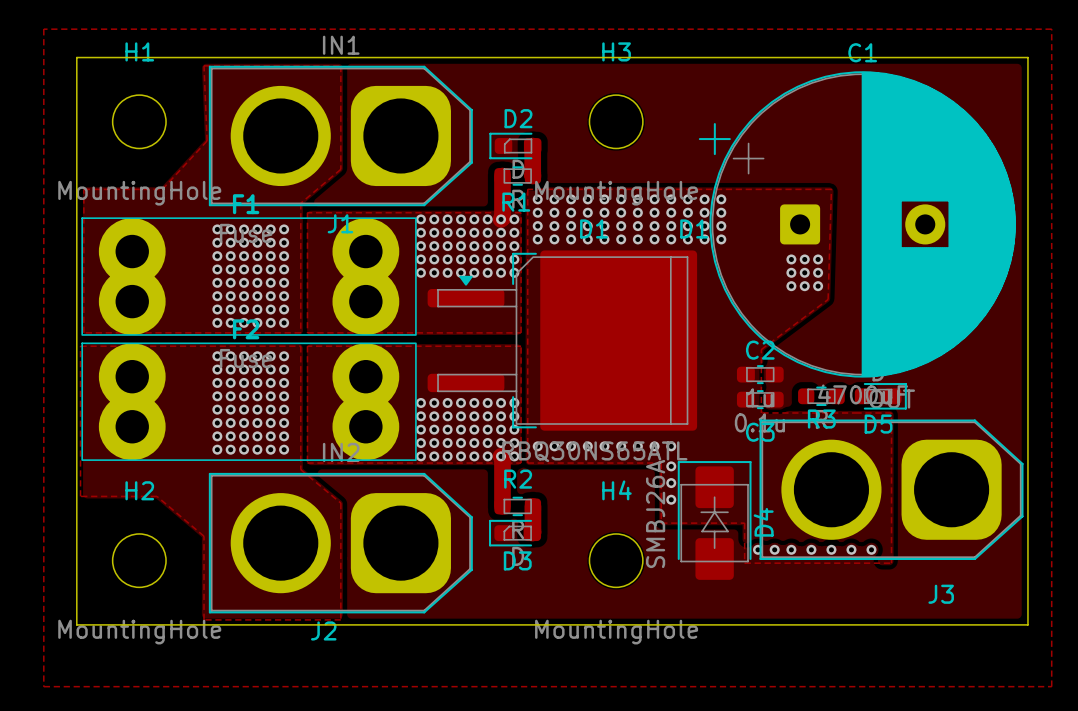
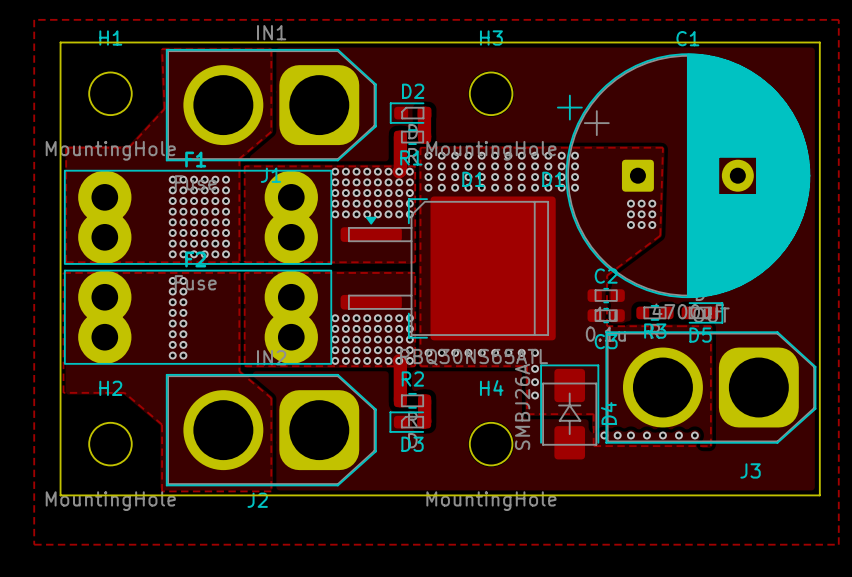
via: (244, 356) -> none
via: (257, 356) -> none
via: (270, 356) -> none
via: (284, 356) -> none
via: (244, 369) -> none
via: (257, 369) -> none
via: (270, 369) -> none
via: (284, 369) -> none
via: (244, 382) -> none
via: (257, 382) -> none
via: (270, 382) -> none
via: (284, 382) -> none
via: (244, 396) -> none
via: (257, 396) -> none
via: (270, 396) -> none
via: (284, 396) -> none
via: (244, 409) -> none
via: (257, 409) -> none
via: (270, 409) -> none
via: (284, 409) -> none
via: (244, 422) -> none
via: (257, 422) -> none
via: (270, 422) -> none
via: (284, 422) -> none
via: (244, 436) -> none
via: (257, 436) -> none
via: (270, 436) -> none
via: (284, 436) -> none
via: (244, 449) -> none
via: (257, 449) -> none
via: (270, 449) -> none
via: (284, 449) -> none

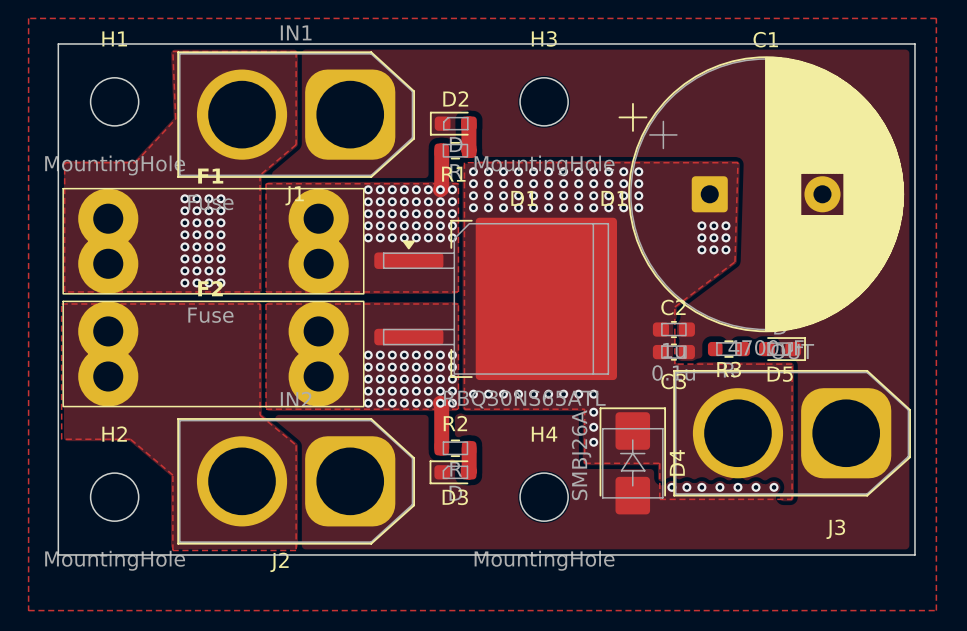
via: (215, 179) -> none
via: (226, 179) -> none
via: (215, 190) -> none
via: (226, 190) -> none
via: (215, 201) -> none
via: (226, 201) -> none
via: (215, 211) -> none
via: (226, 211) -> none
via: (215, 222) -> none
via: (226, 222) -> none
via: (215, 232) -> none
via: (226, 232) -> none
via: (215, 243) -> none
via: (226, 243) -> none
via: (215, 254) -> none
via: (226, 254) -> none
via: (172, 280) -> none
via: (183, 280) -> none
via: (172, 291) -> none
via: (183, 291) -> none
via: (172, 302) -> none
via: (183, 302) -> none
via: (172, 312) -> none
via: (183, 312) -> none
via: (172, 323) -> none
via: (183, 323) -> none
via: (172, 334) -> none
via: (183, 334) -> none
via: (172, 344) -> none
via: (183, 344) -> none
via: (172, 355) -> none
via: (183, 355) -> none

